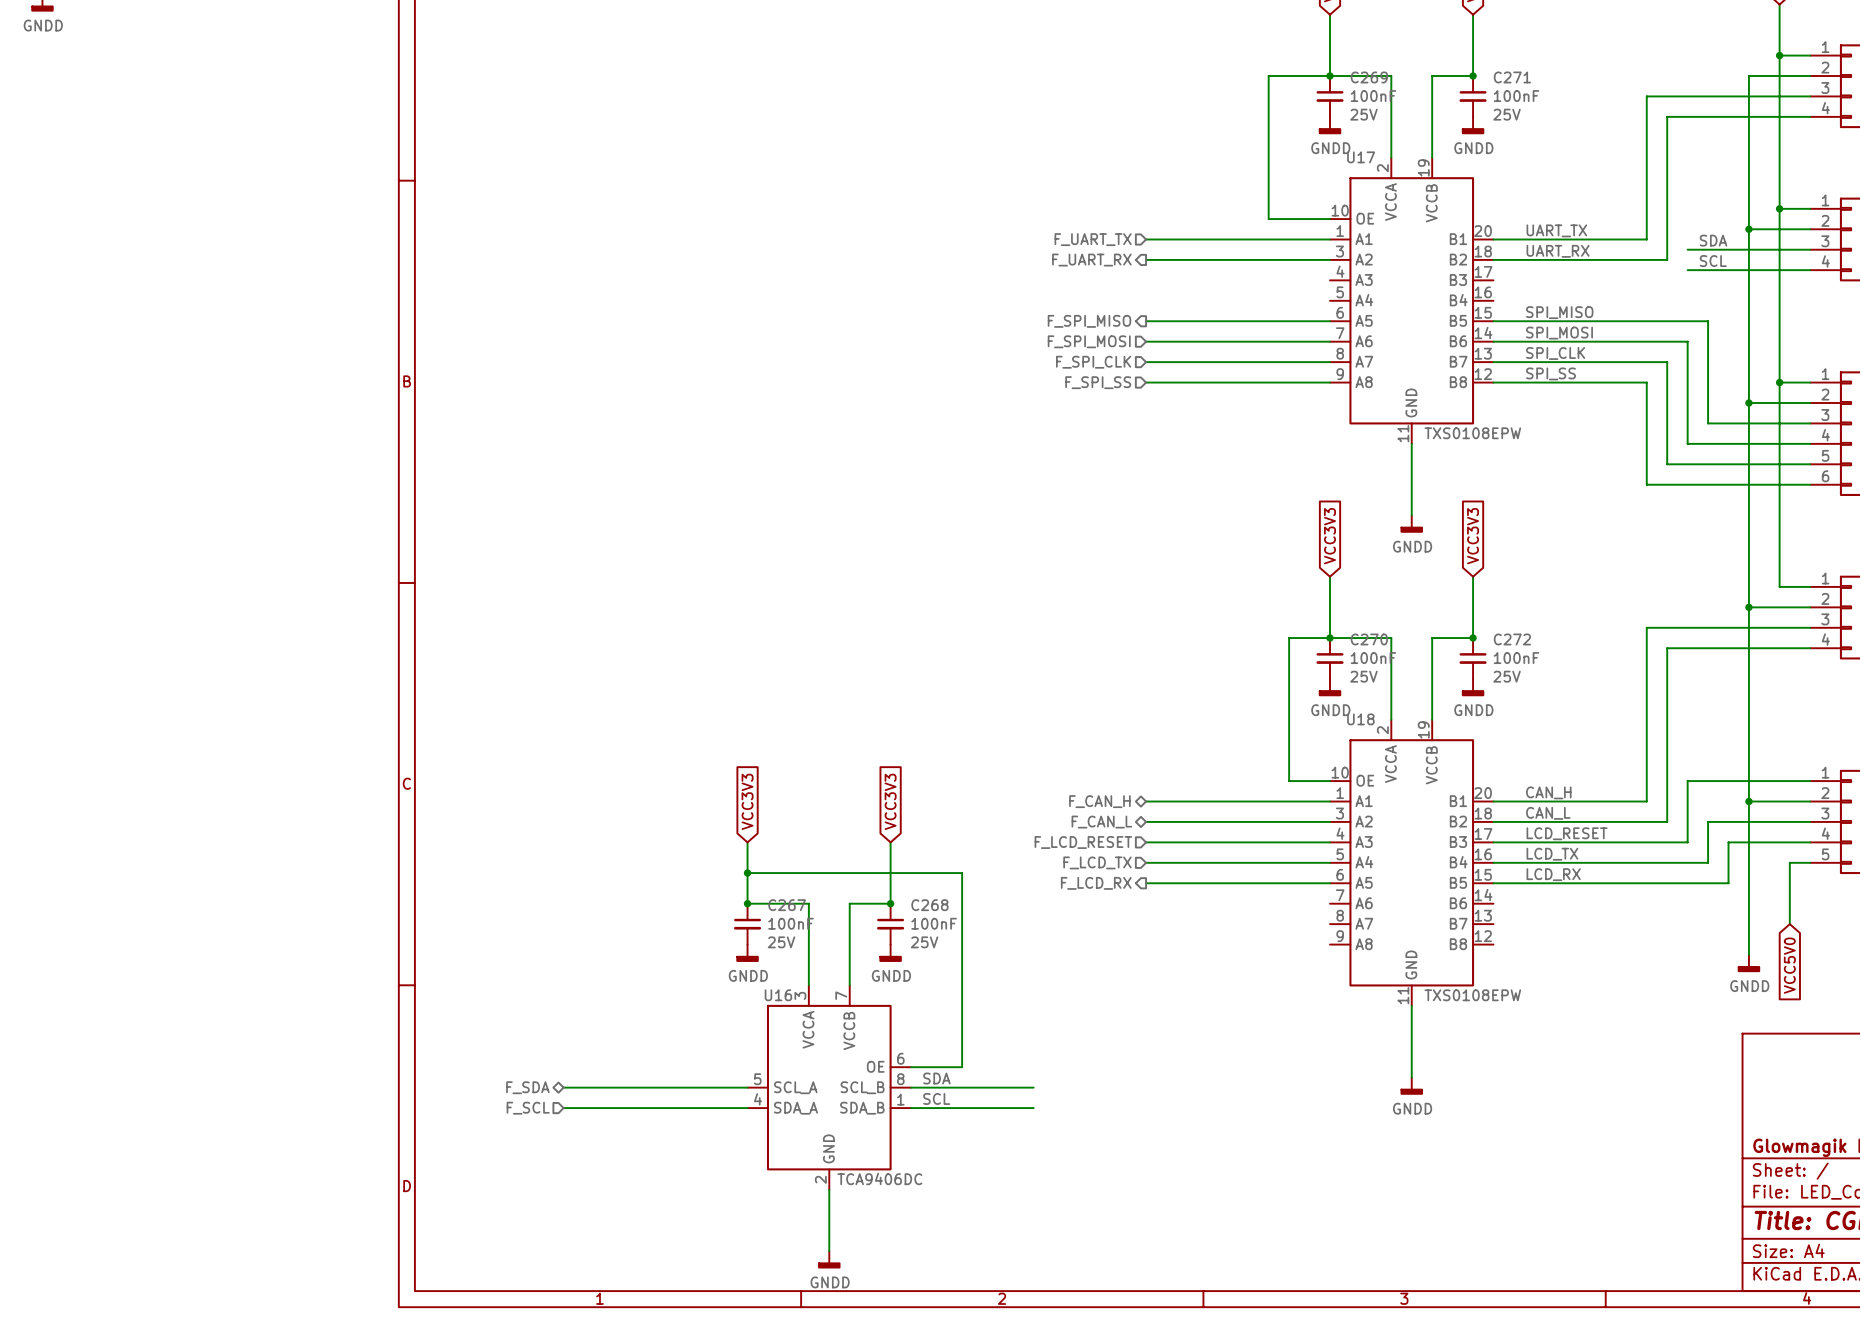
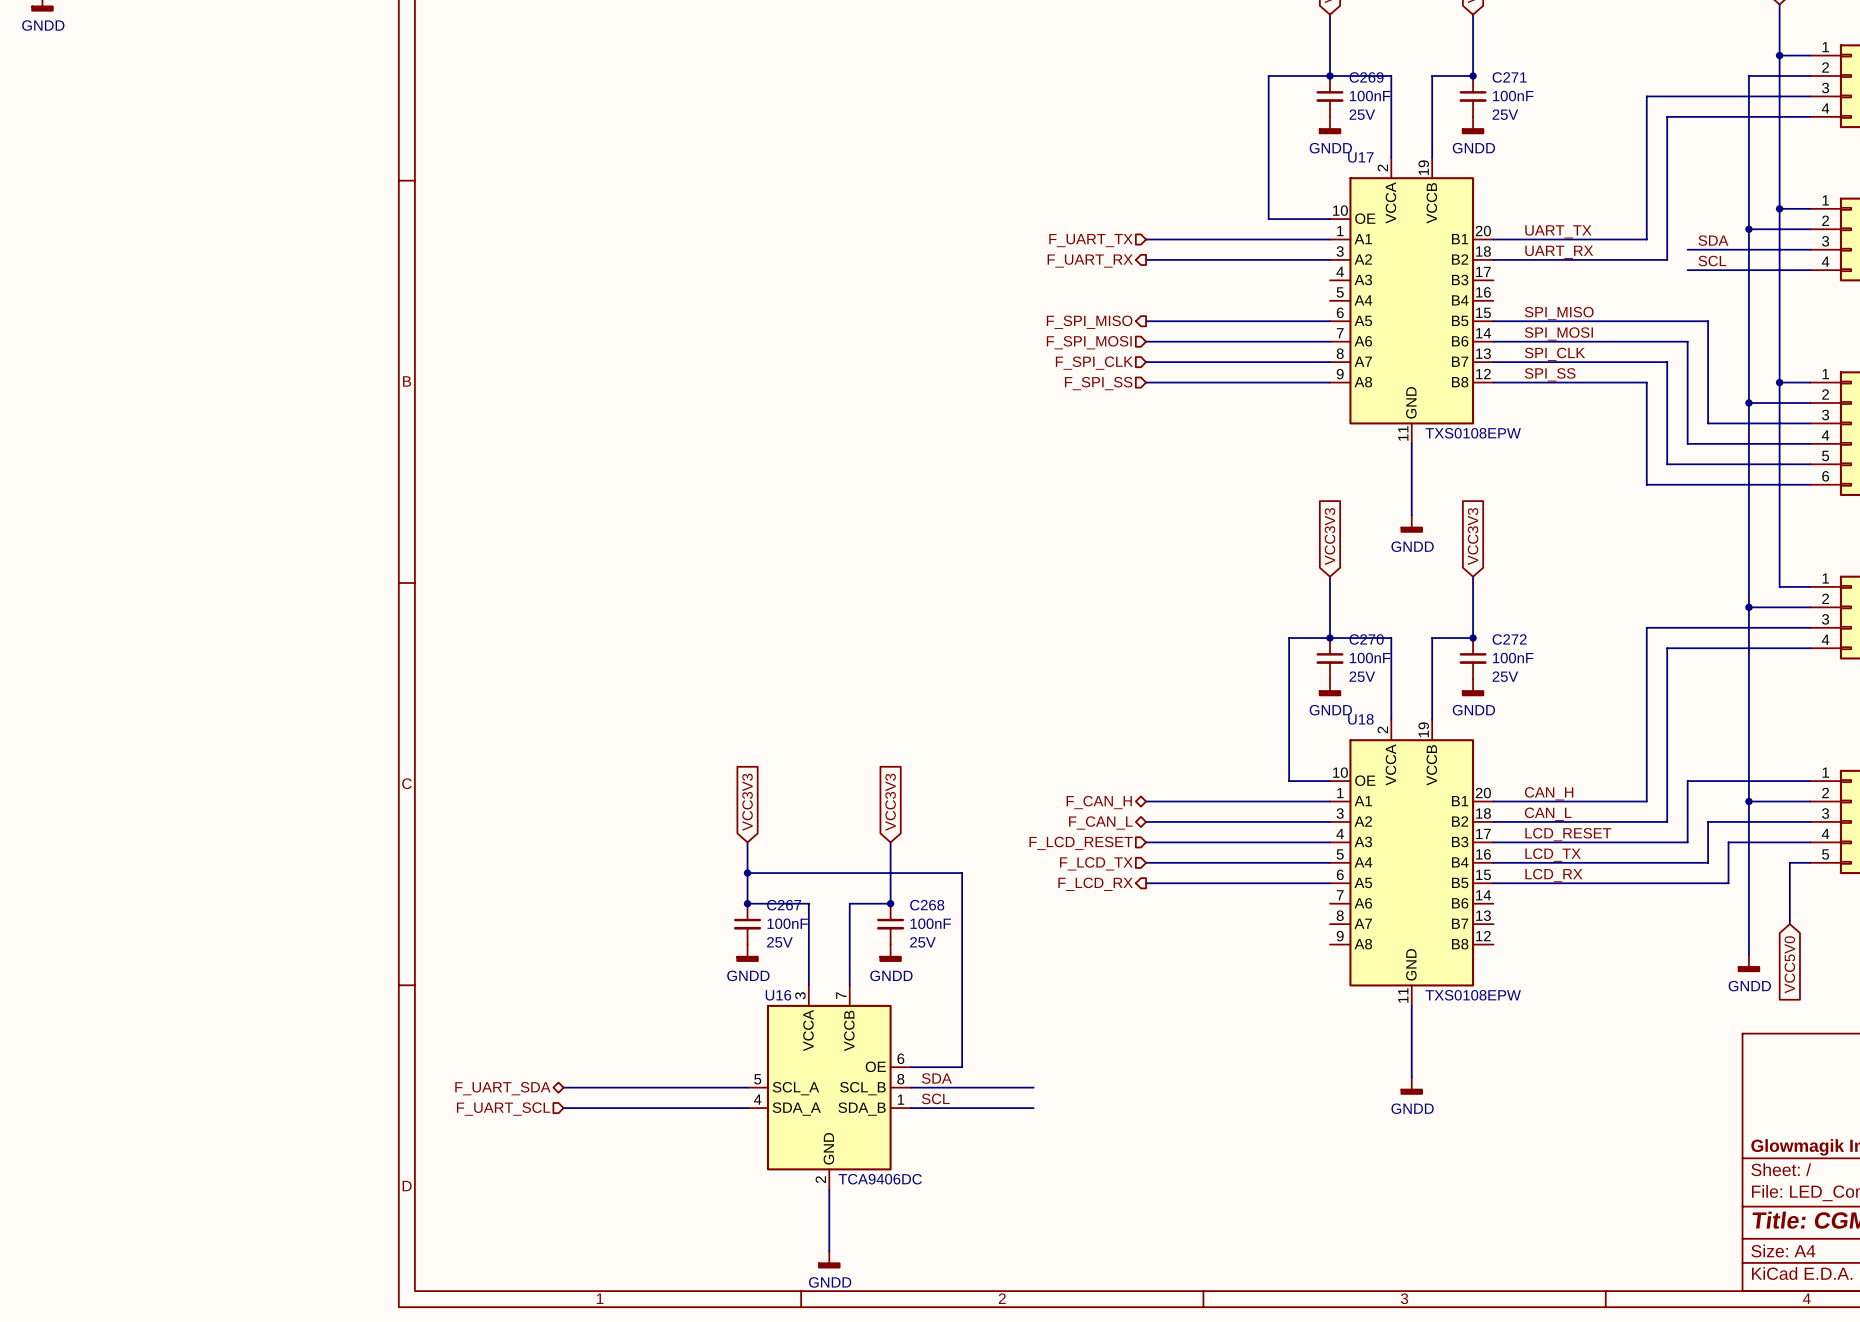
hierarchical label: F_SDA (527, 1087) -> F_UART_SDA (502, 1088)
hierarchical label: F_SCL (528, 1108) -> F_UART_SCL (503, 1109)

